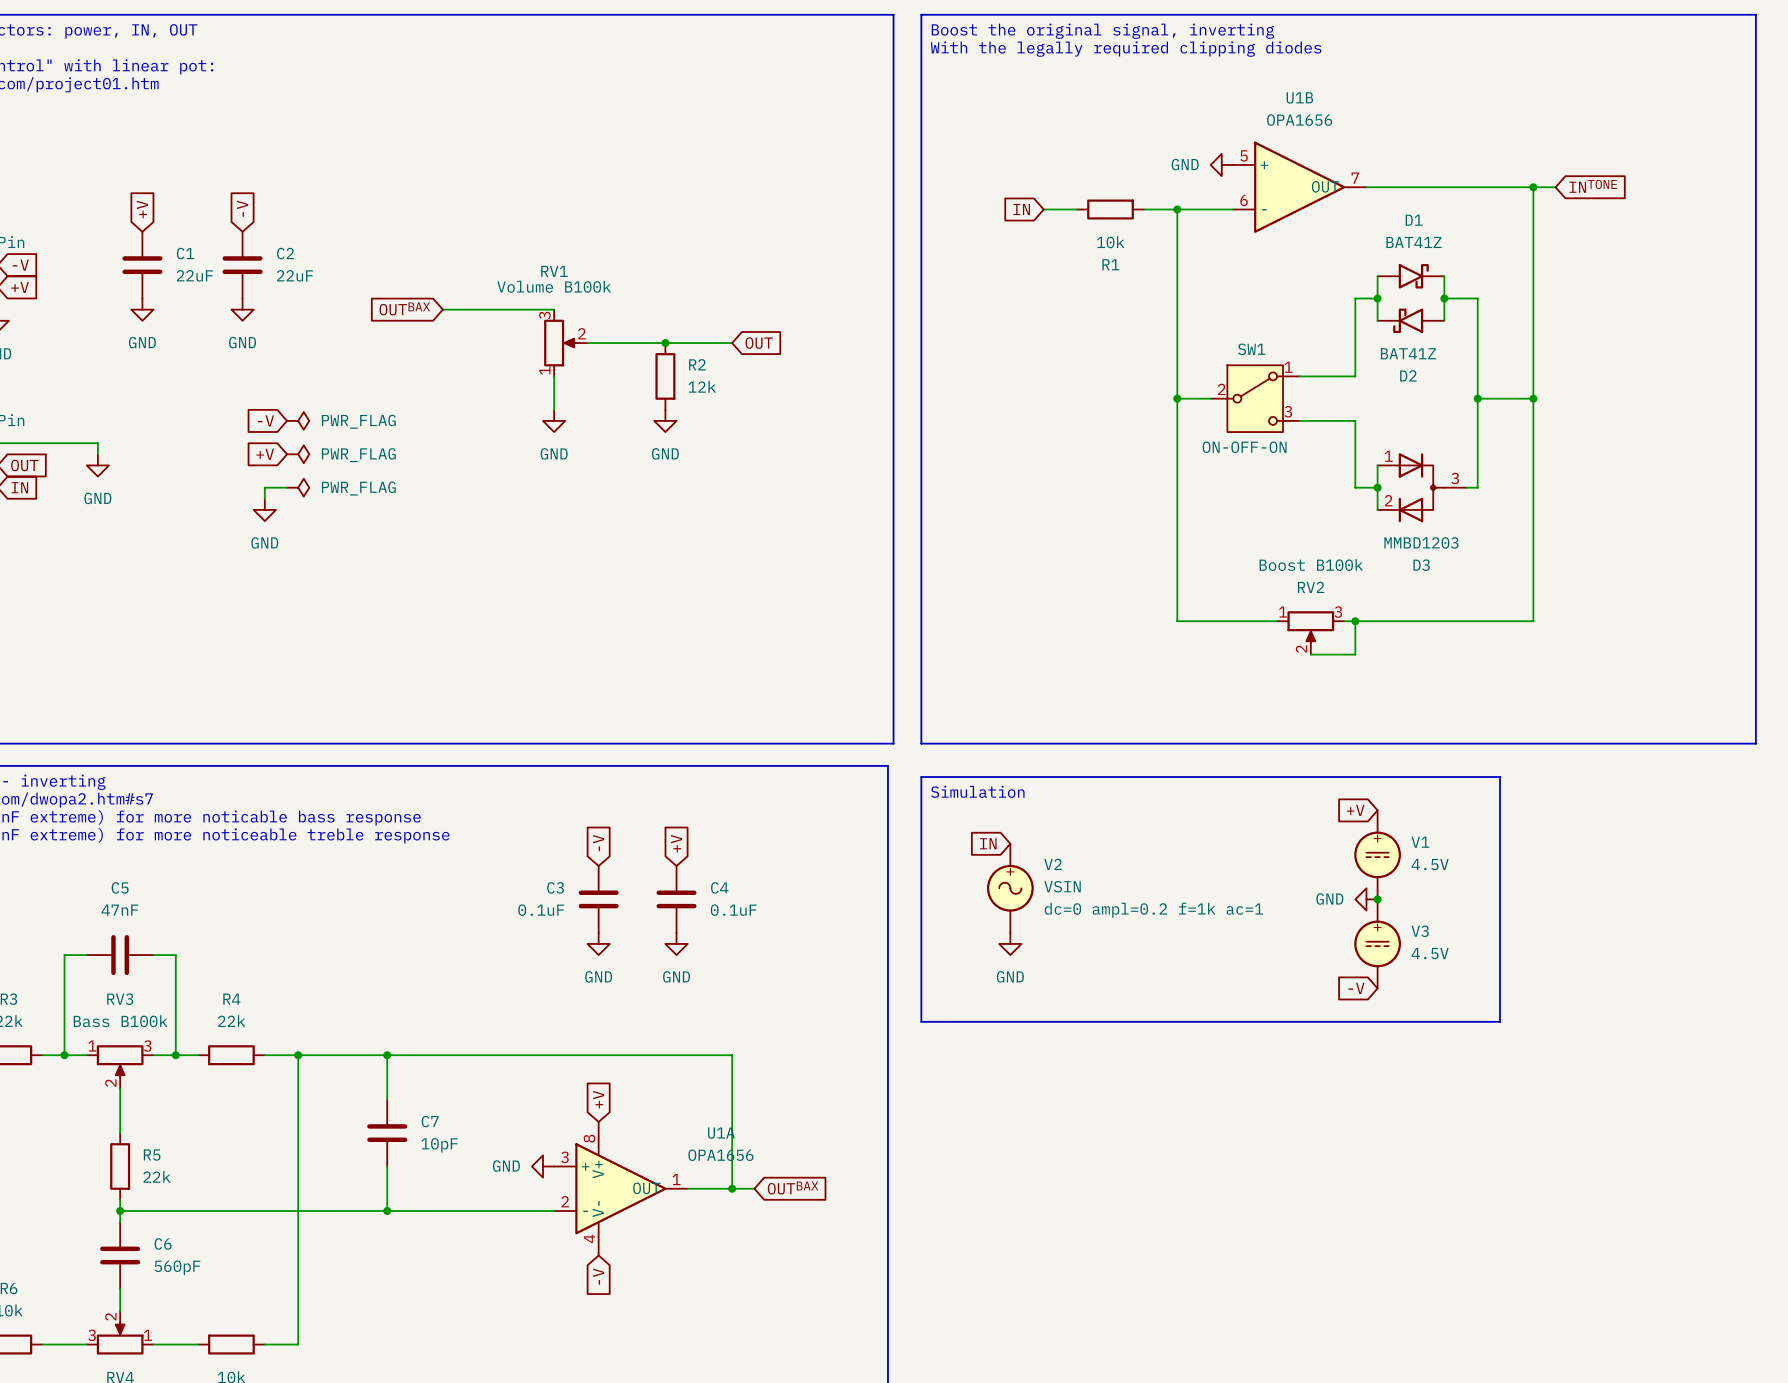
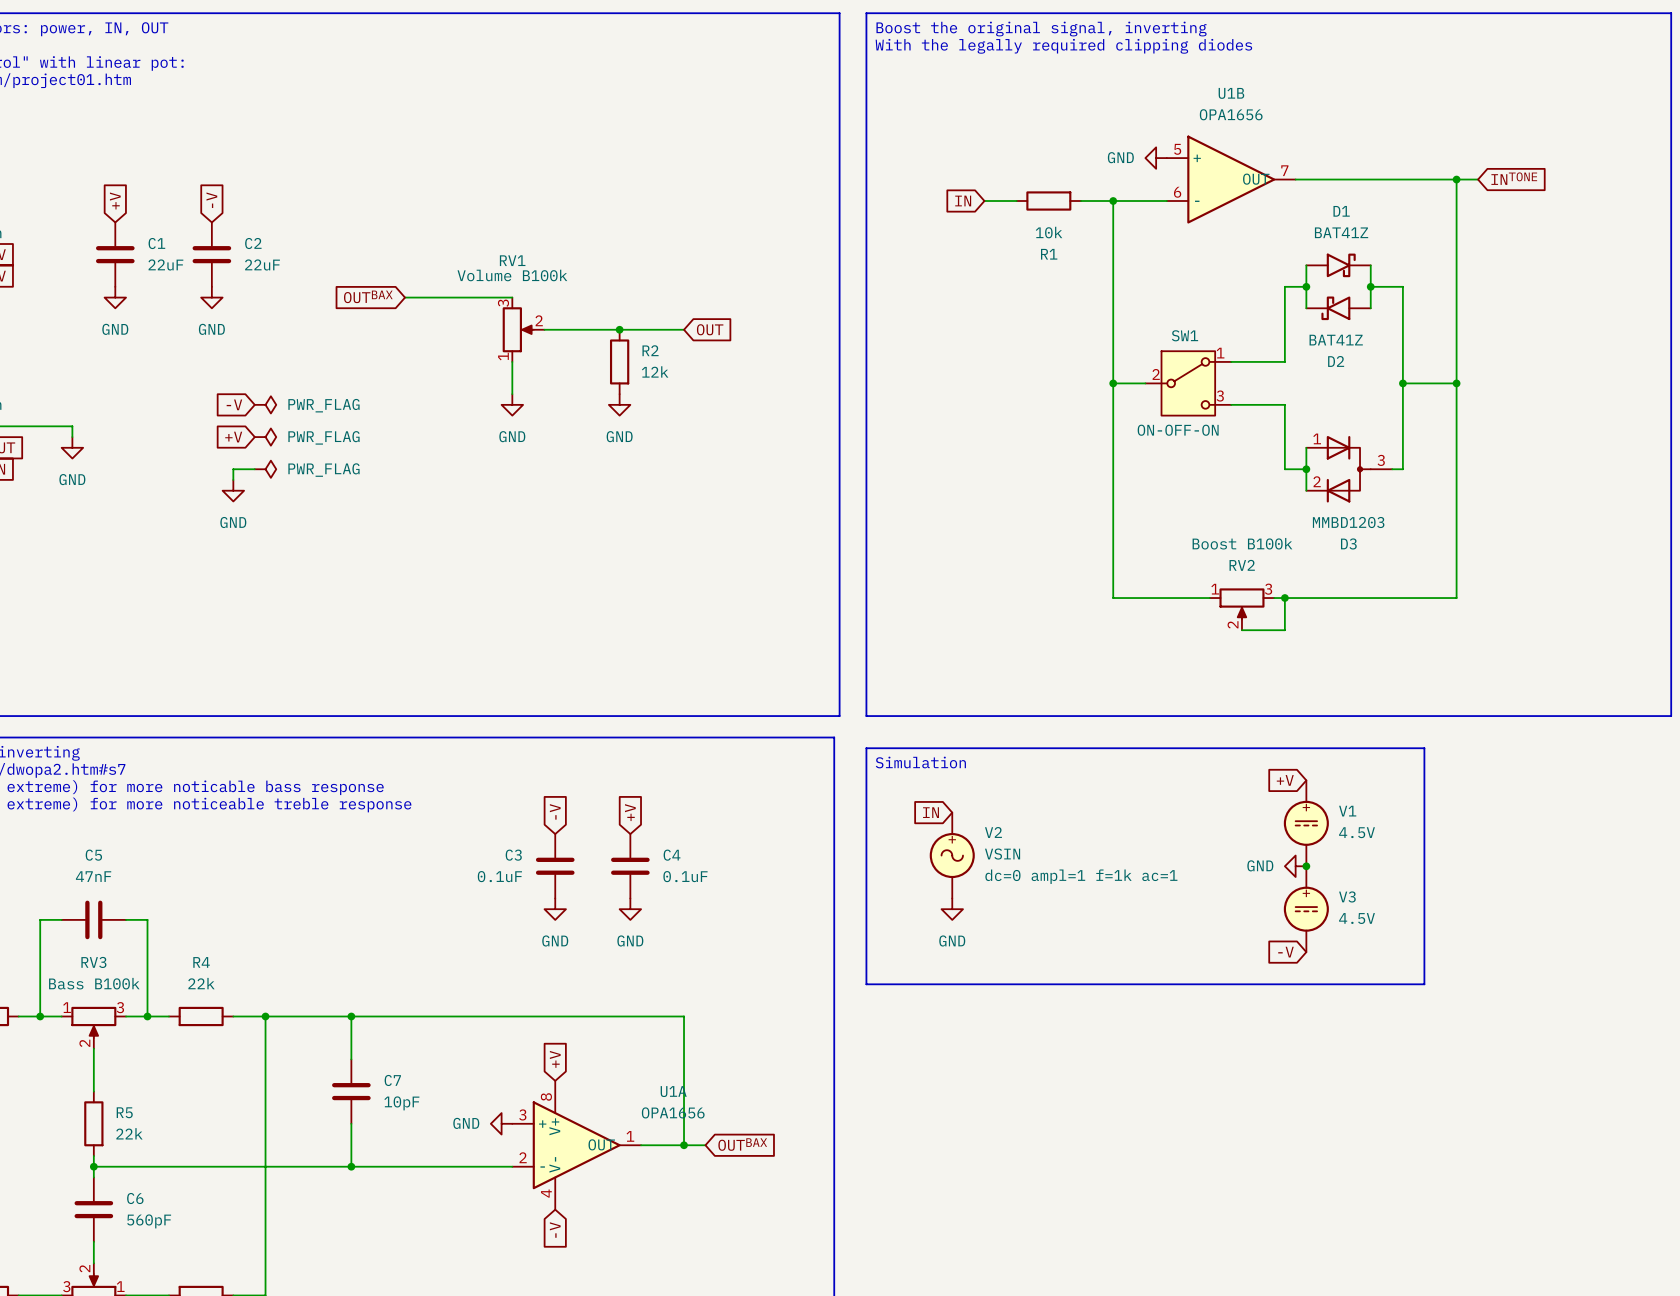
V2 text: dc=0 ampl=0.2 f=1k ac=1 (1153, 910) -> dc=0 ampl=1 f=1k ac=1 (1081, 876)

